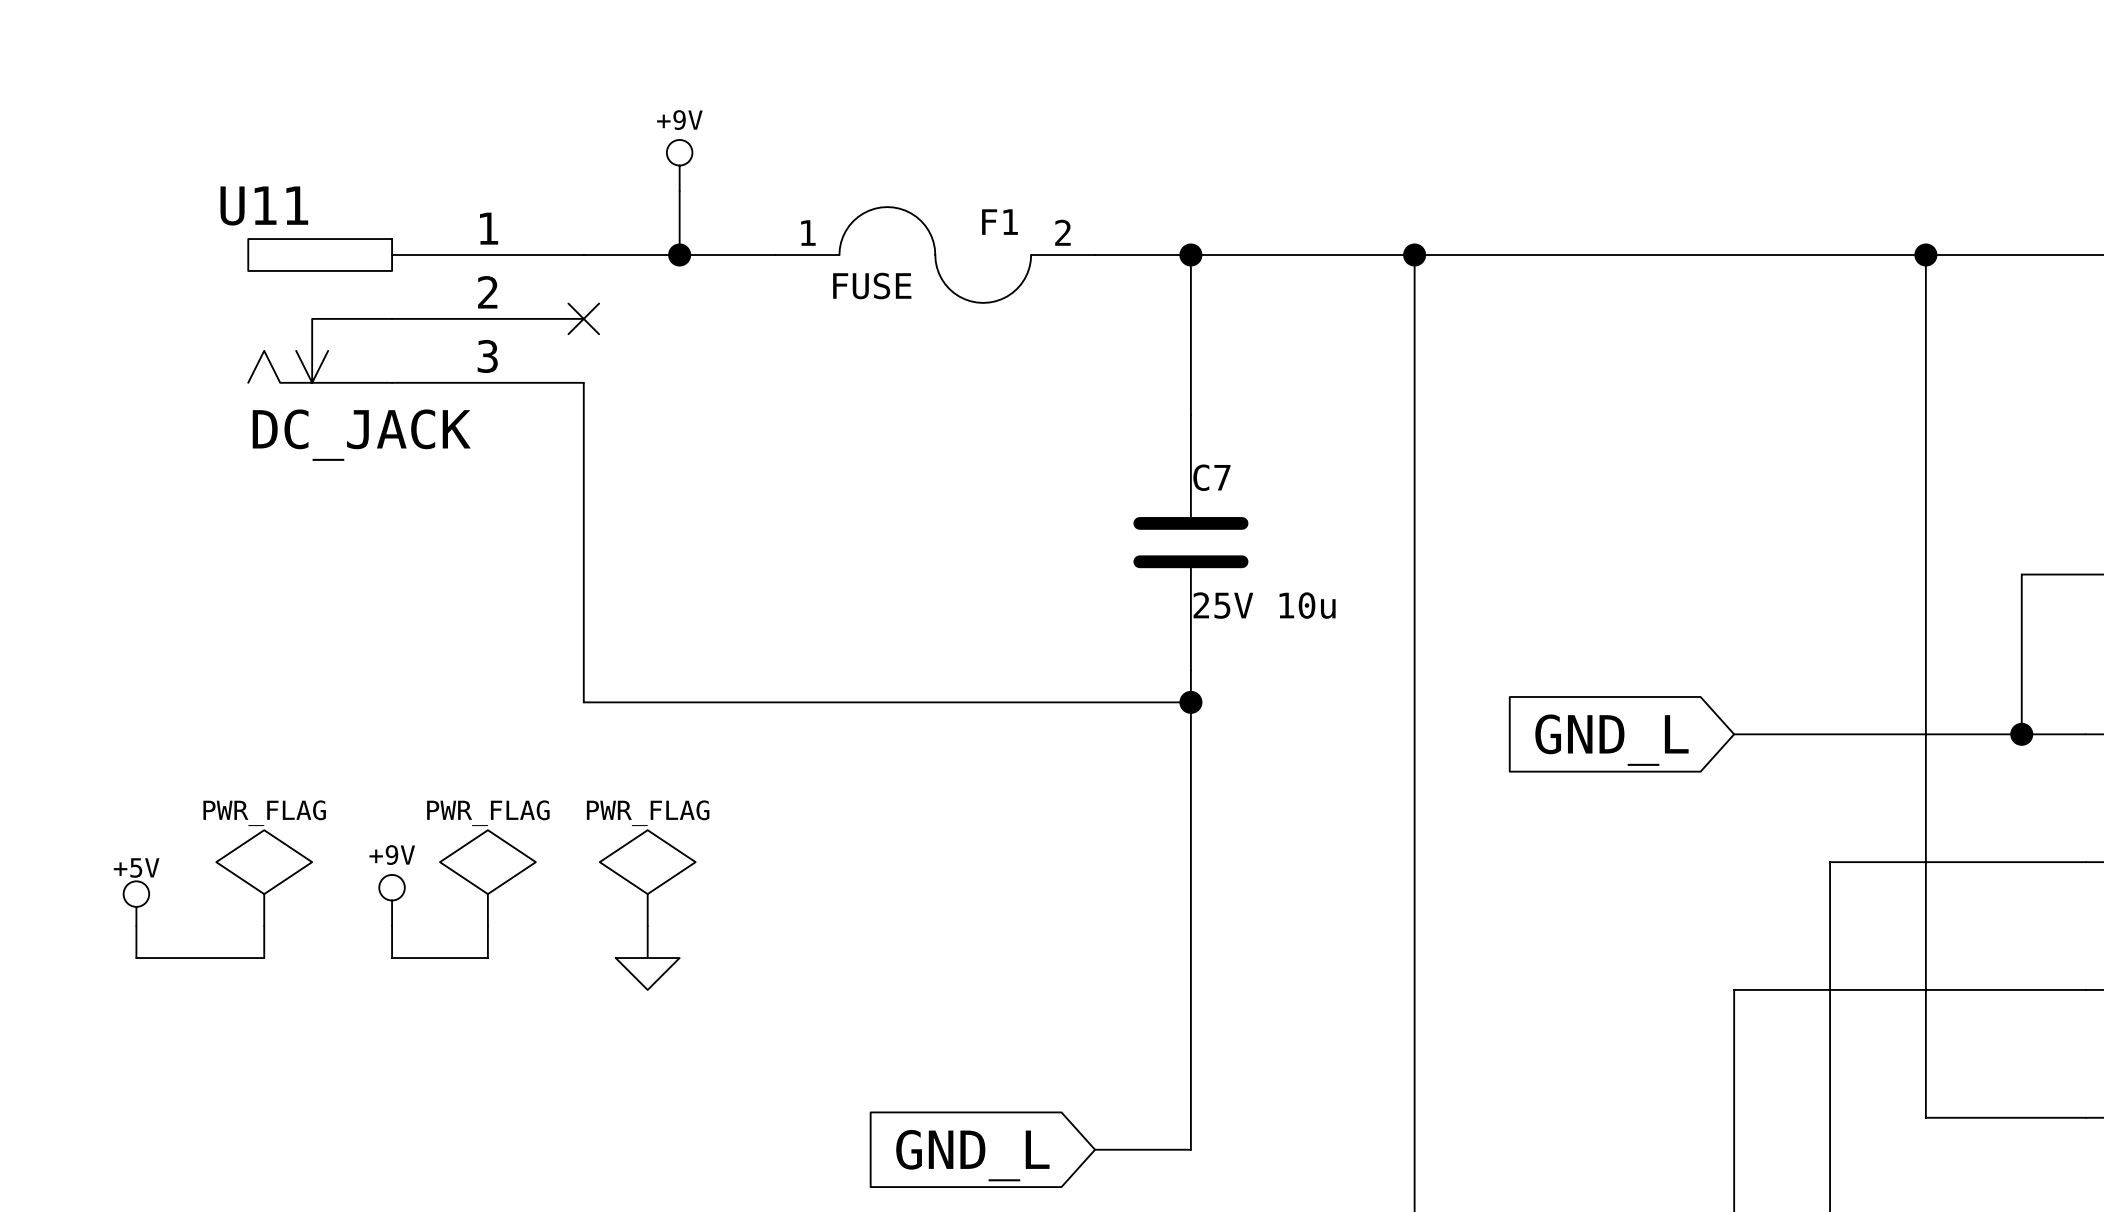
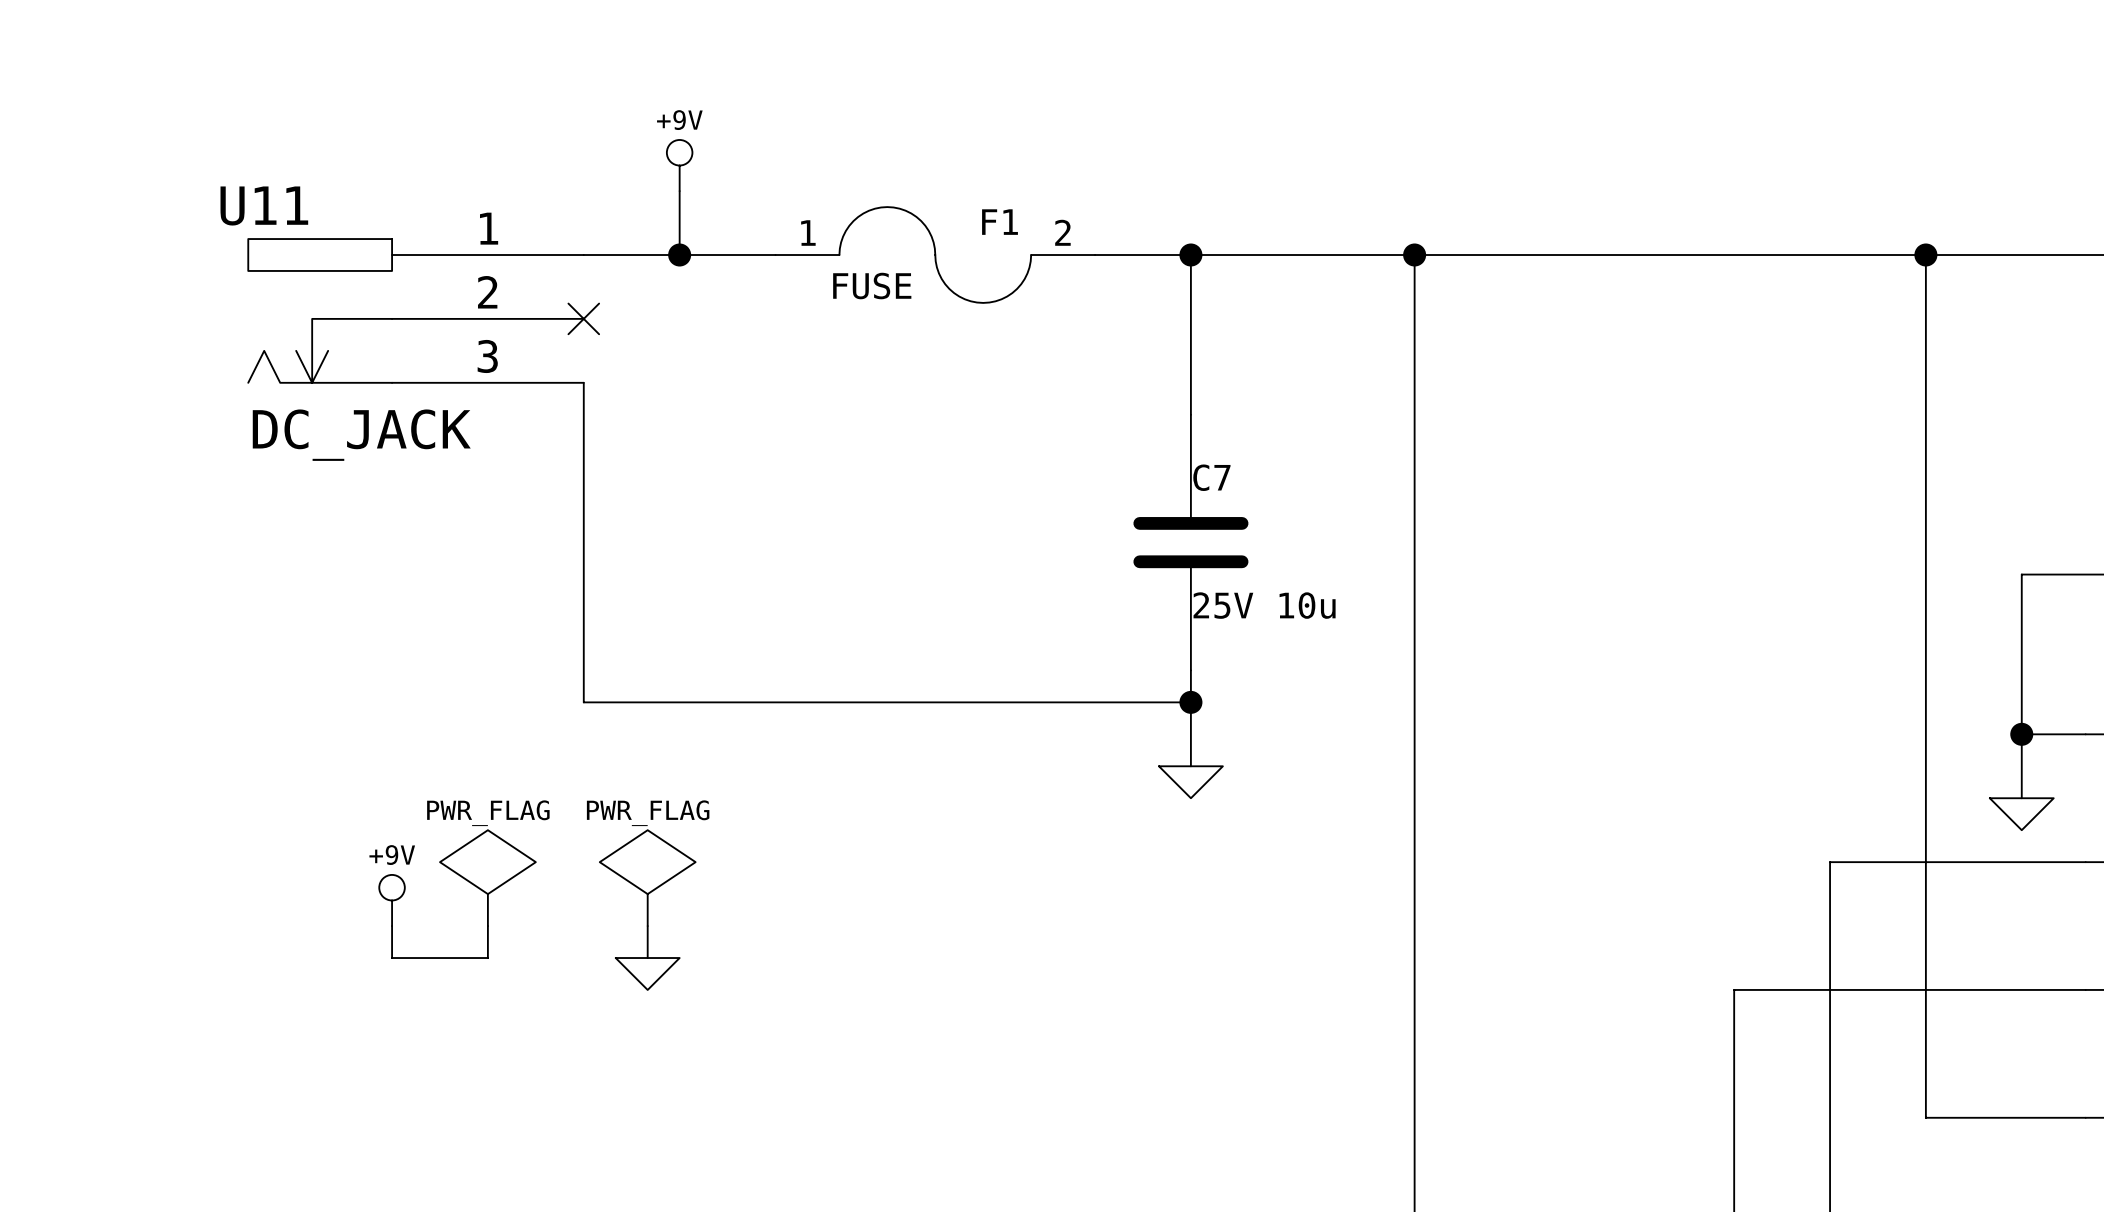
wire: (1734, 734) (2021, 734) -> (2021, 798) (2021, 734)
global label: GND_L (1611, 740) -> none
wire: (1190, 766) (1190, 1149) (1095, 1149) -> none
power symbol: none -> (1190, 782)
power symbol: none -> (2021, 814)
power symbol: PWR_FLAG (264, 878) -> none
power symbol: +5V (136, 903) -> none
wire: (136, 926) (136, 958) (264, 958) (264, 926) -> none
global label: GND_L (972, 1155) -> none

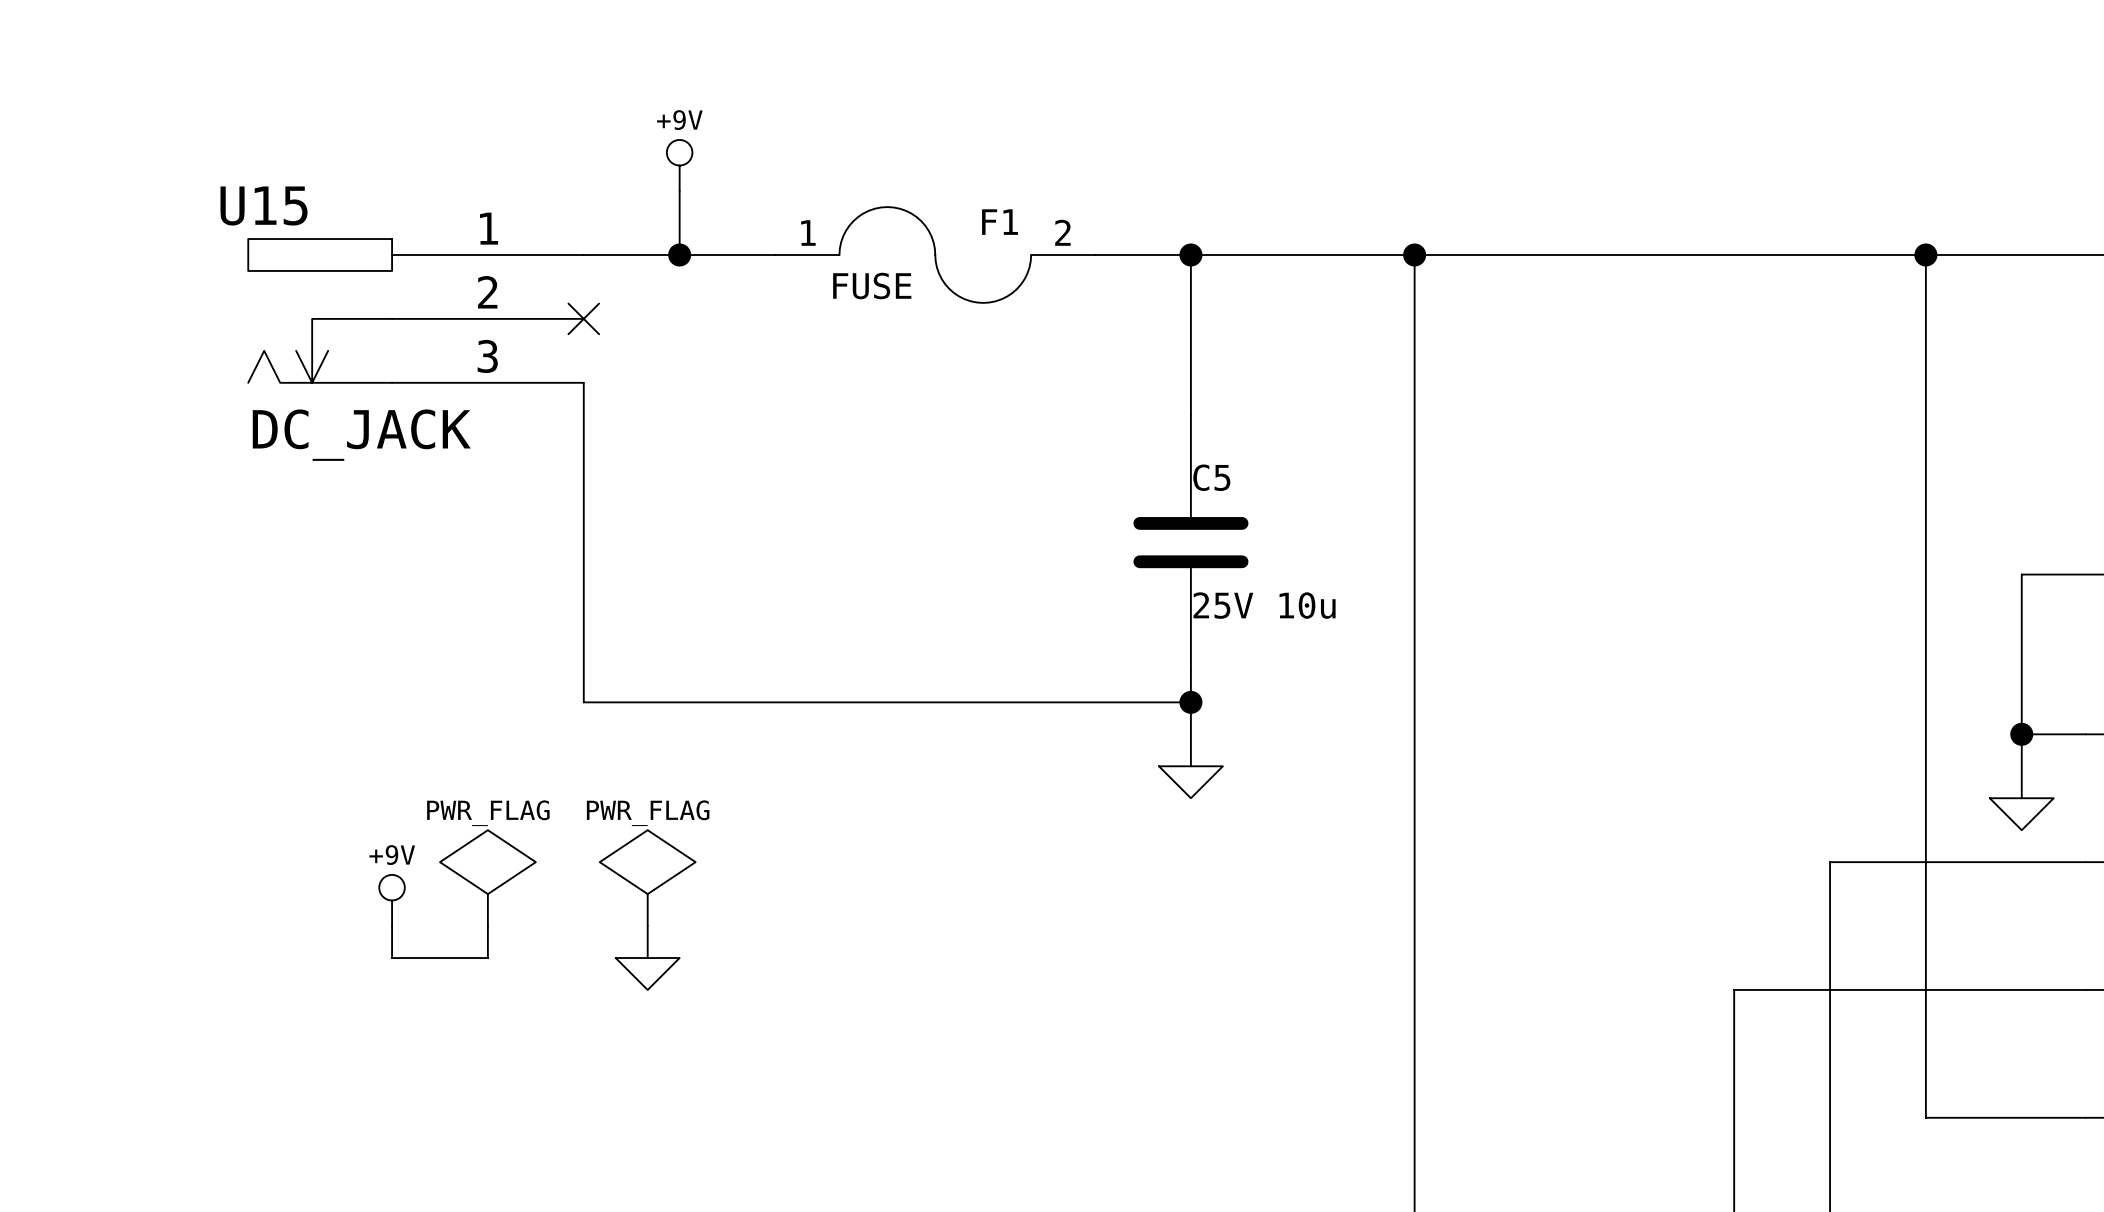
U11 name: U11 (264, 206) -> U15 (264, 206)
C7 name: C7 (1211, 477) -> C5 (1211, 477)

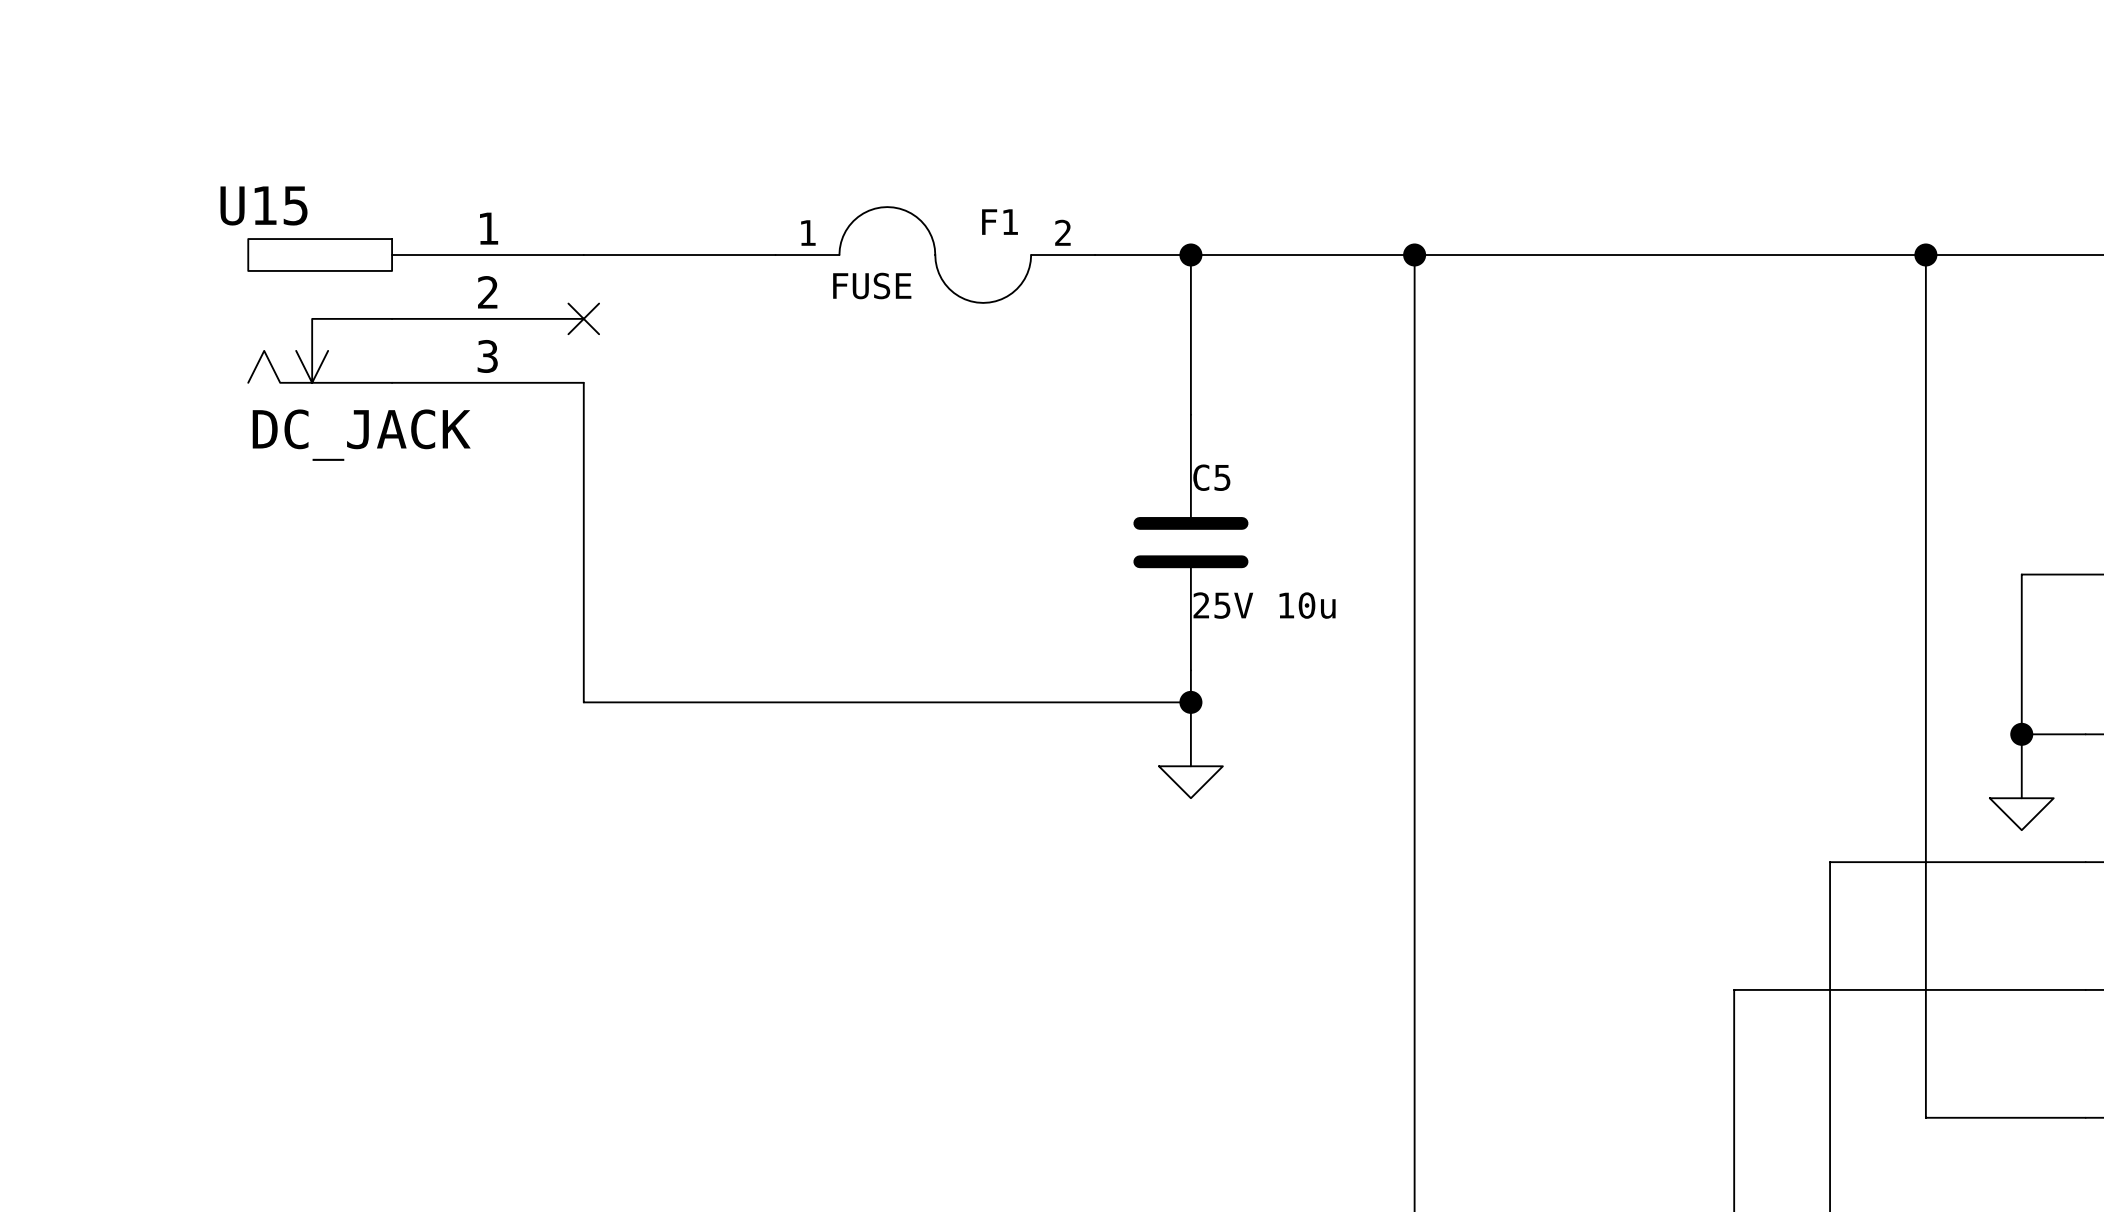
power symbol: +9V (679, 165) -> none
wire: (679, 191) (679, 255) -> none
junction: (679, 255) -> none
power symbol: PWR_FLAG (487, 878) -> none
power symbol: PWR_FLAG (647, 878) -> none
power symbol: +9V (392, 900) -> none
wire: (392, 926) (392, 958) (487, 958) (487, 926) -> none
wire: (647, 926) (647, 958) -> none
power symbol: (647, 973) -> none

